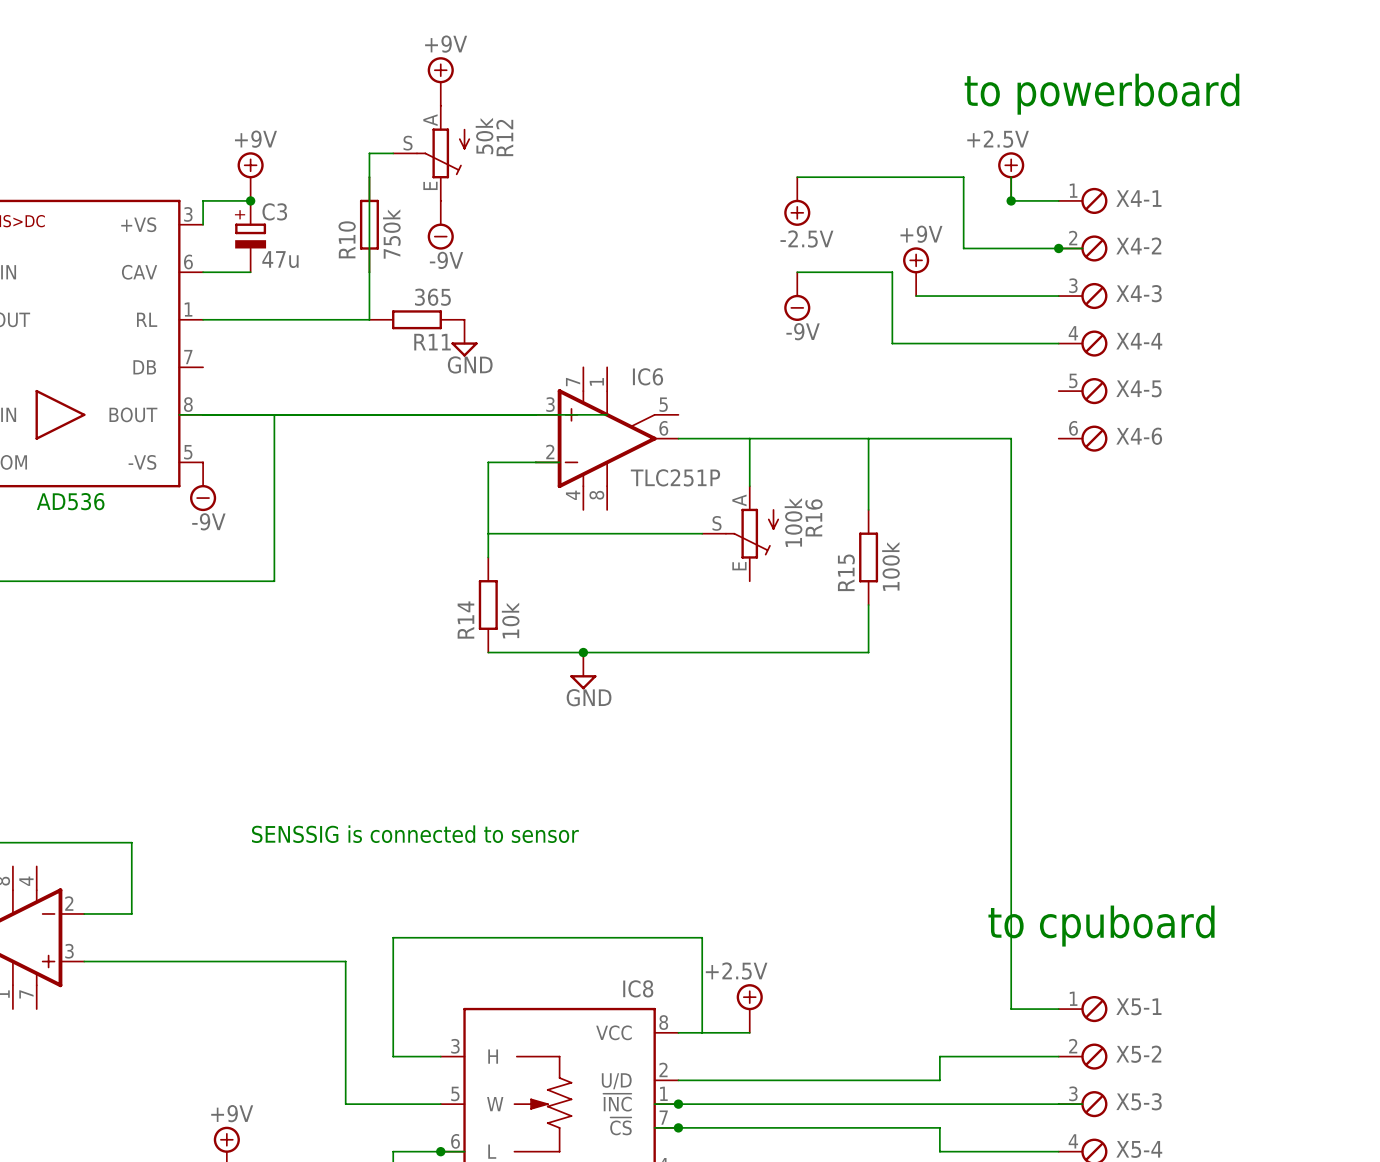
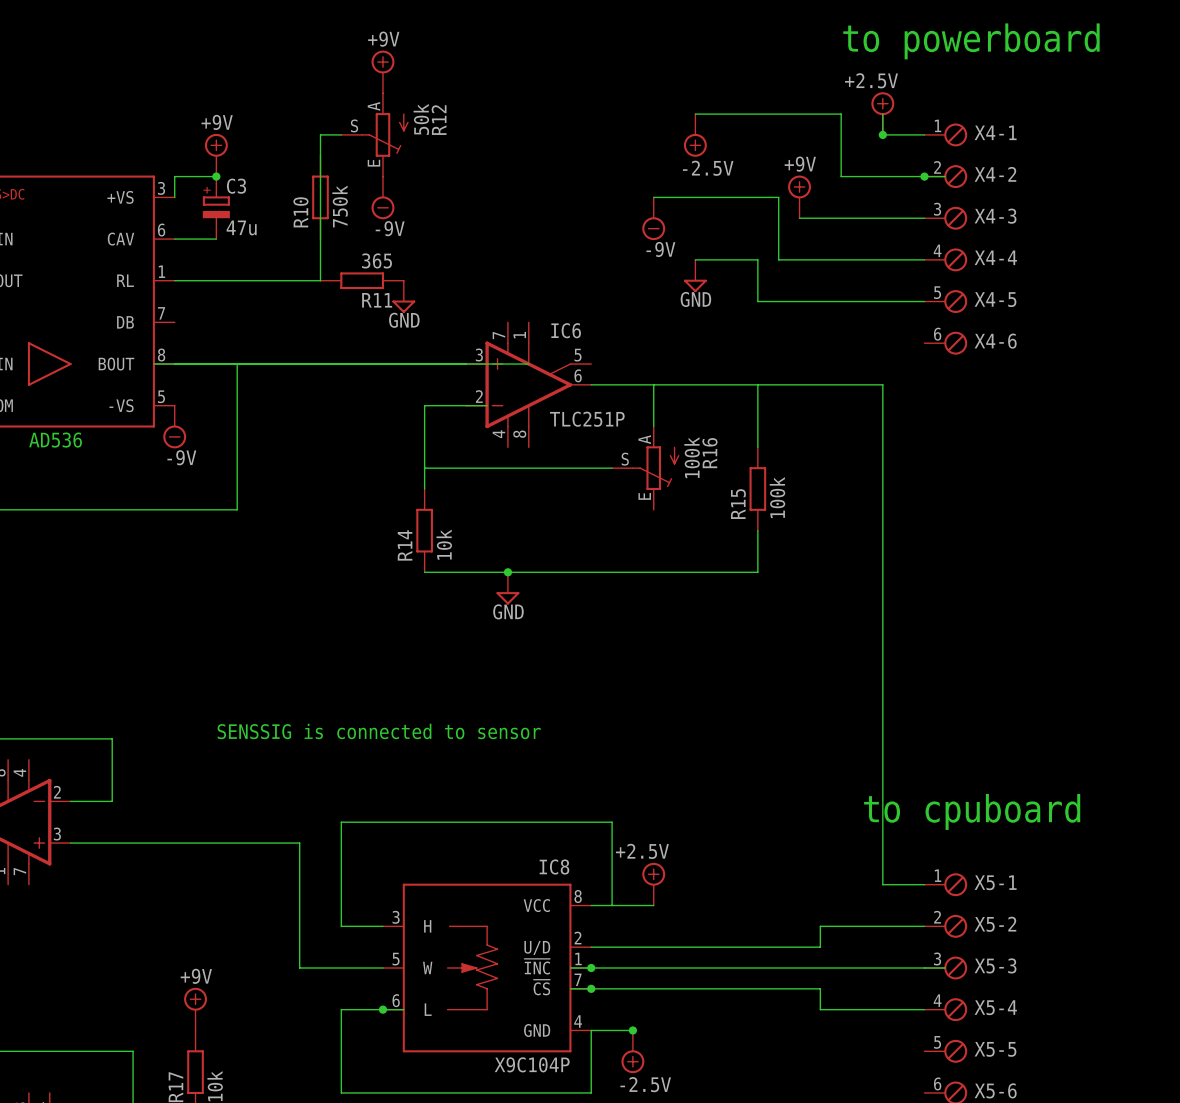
text position: to powerboard (1101, 94) -> to powerboard (971, 41)
wire: none -> (882, 114) (882, 134) (924, 134)
junction: none -> (882, 134)
power symbol position: +2.5V (1011, 176) -> +2.5V (882, 113)
wire: (797, 177) (963, 177) -> (695, 114) (841, 114) (841, 155)
wire: (1011, 177) (1011, 200) -> (841, 176) (882, 176)
wire: (963, 200) (963, 248) -> (799, 218) (841, 218)
junction: (1011, 200) -> none
junction: none -> (924, 176)
X4-1 position: (1083, 200) -> (945, 134)
power symbol position: -2.5V (797, 201) -> -2.5V (695, 135)
junction: (1058, 248) -> none
X4-2 position: (1083, 248) -> (945, 176)
power symbol position: +9V (916, 271) -> +9V (799, 196)
wire: (797, 272) (892, 272) -> (653, 197) (778, 197) (778, 239)
wire: none -> (695, 259) (757, 259) (757, 301) (778, 301)
power symbol position: -9V (797, 296) -> -9V (653, 218)
wire: (892, 296) (892, 343) -> (778, 259) (799, 259)
X4-3 position: (1083, 296) -> (945, 218)
power symbol: none -> GND (695, 276)
X4-4 position: (1083, 343) -> (945, 259)
X4-5 position: (1083, 391) -> (945, 301)
X4-6 position: (1083, 438) -> (945, 343)

